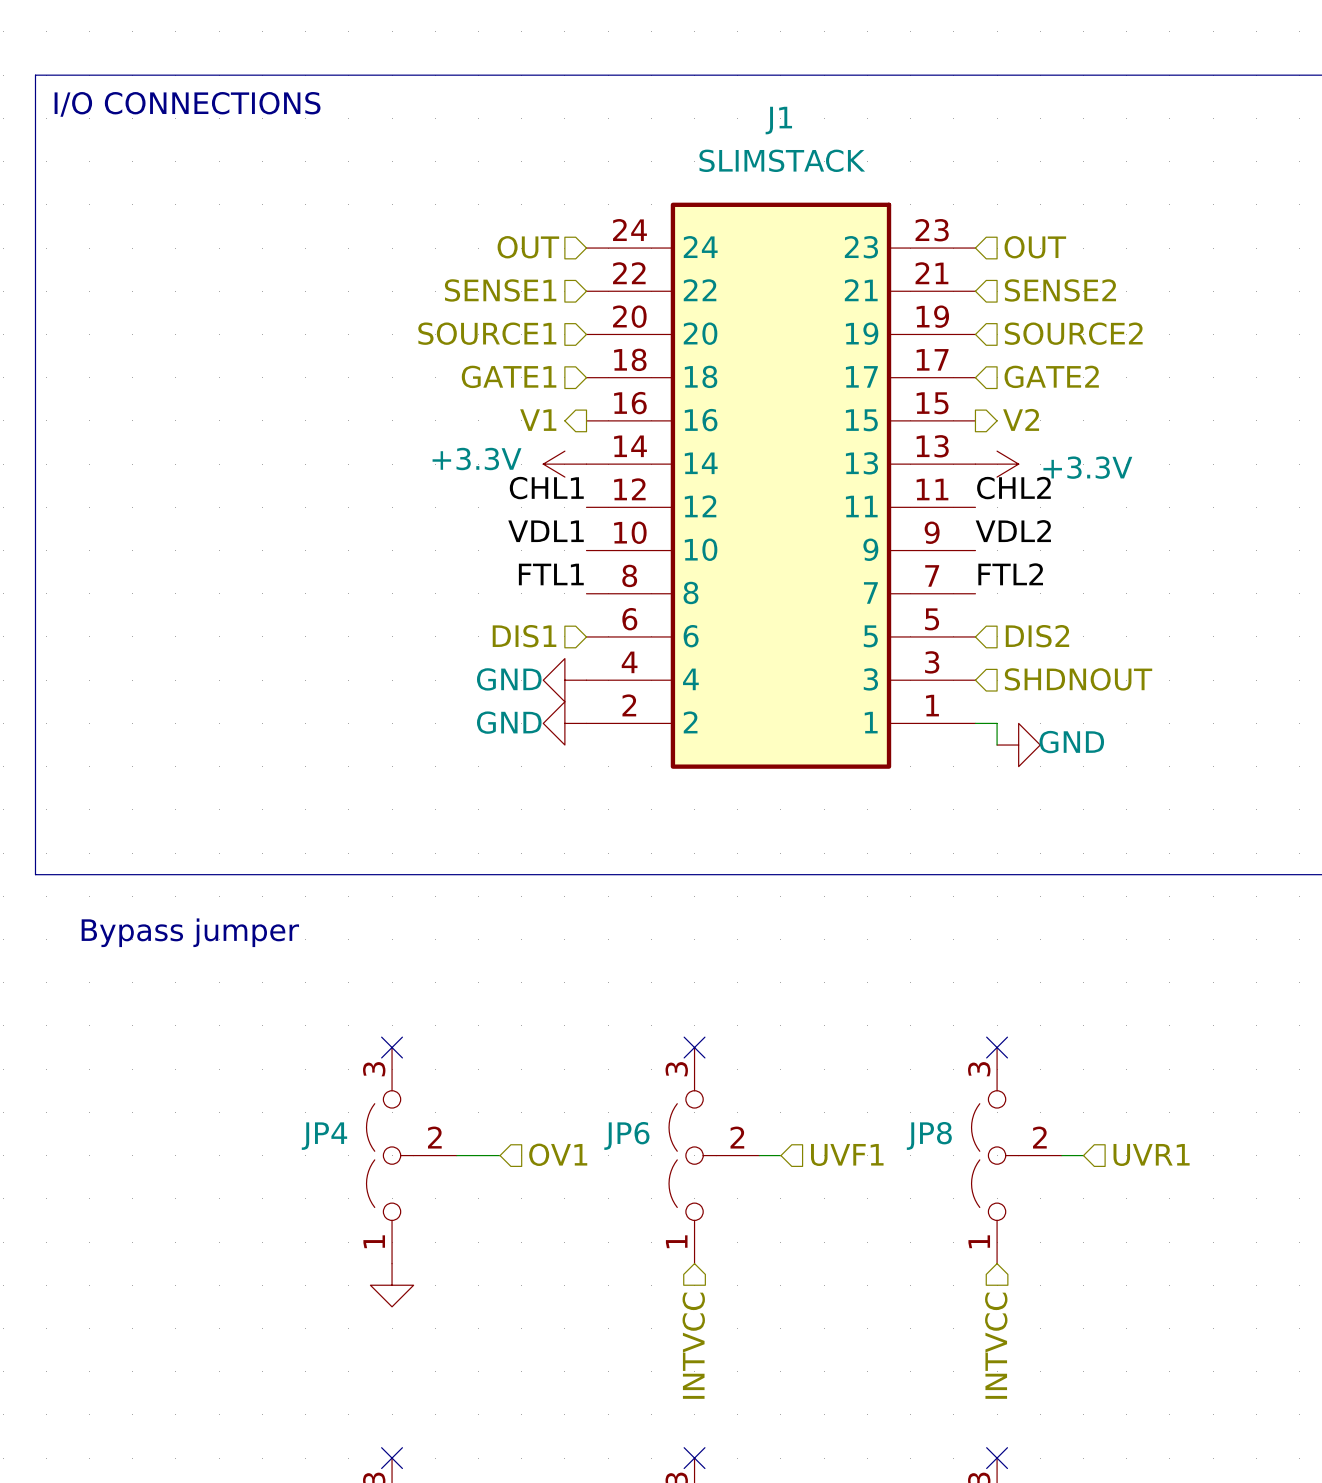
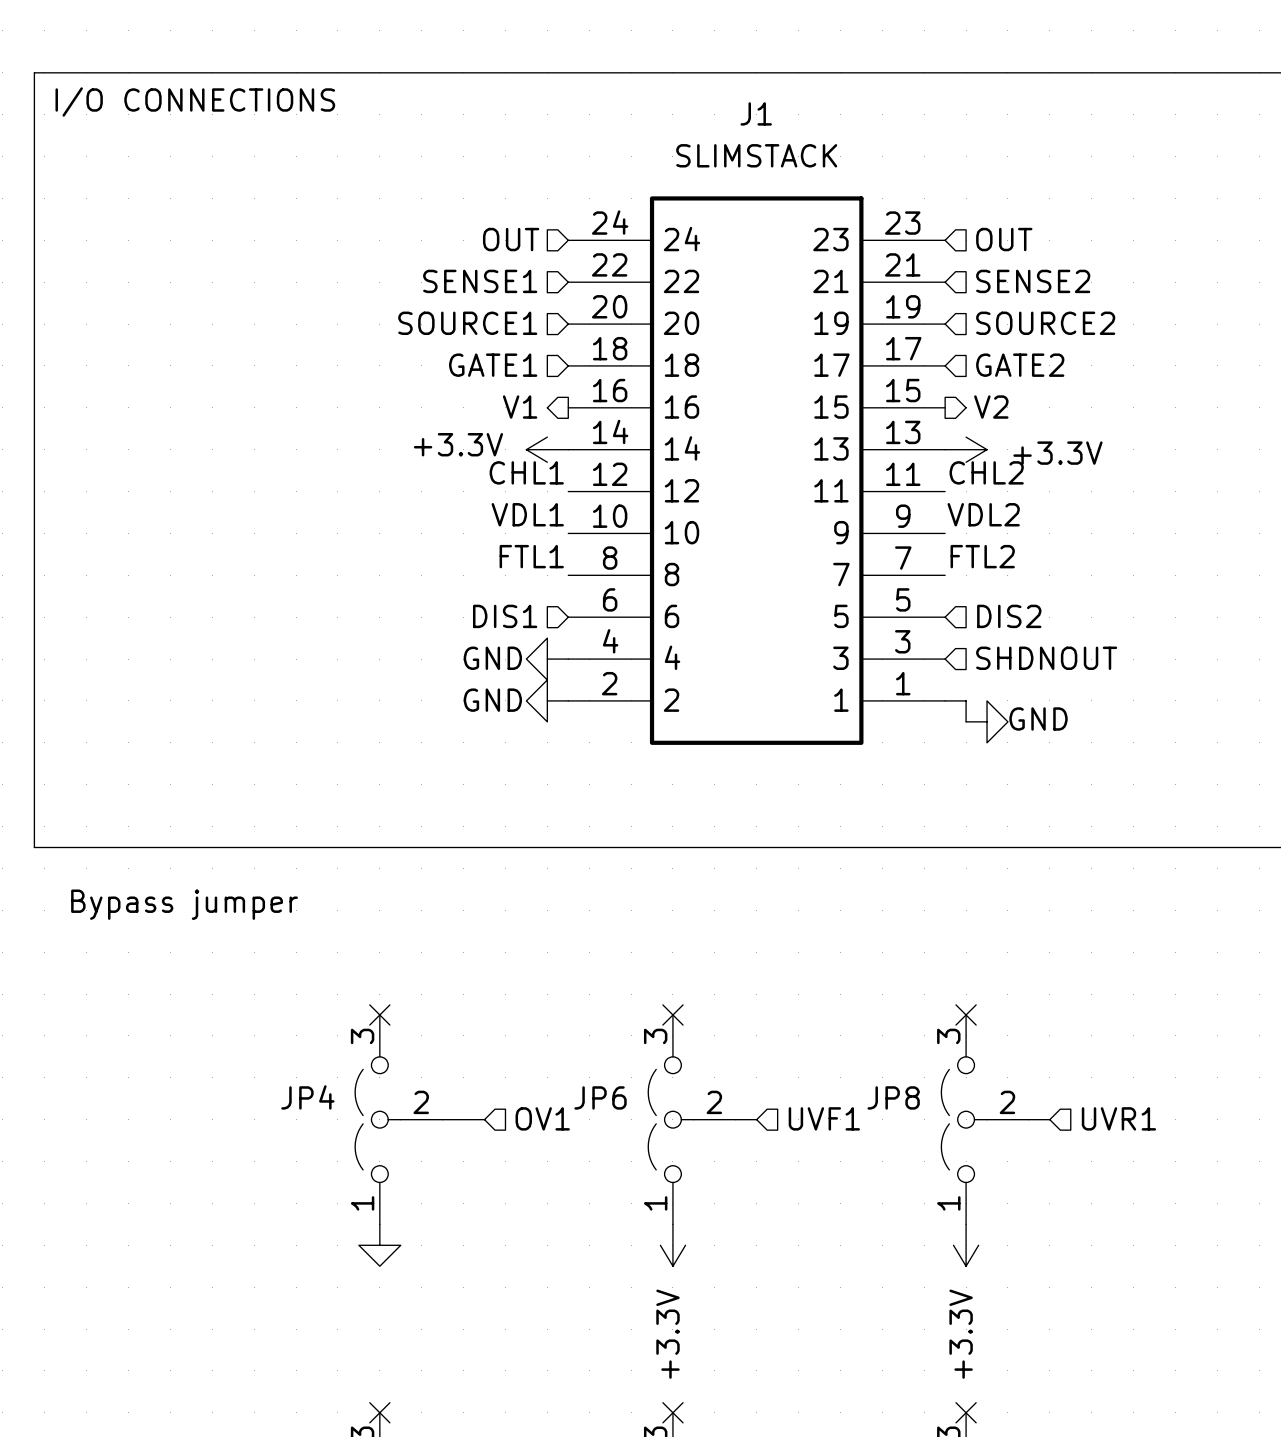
power symbol: none -> +3.3V (672, 1245)
power symbol: none -> +3.3V (966, 1245)
hierarchical label: INTVCC (693, 1345) -> none
hierarchical label: INTVCC (996, 1345) -> none

